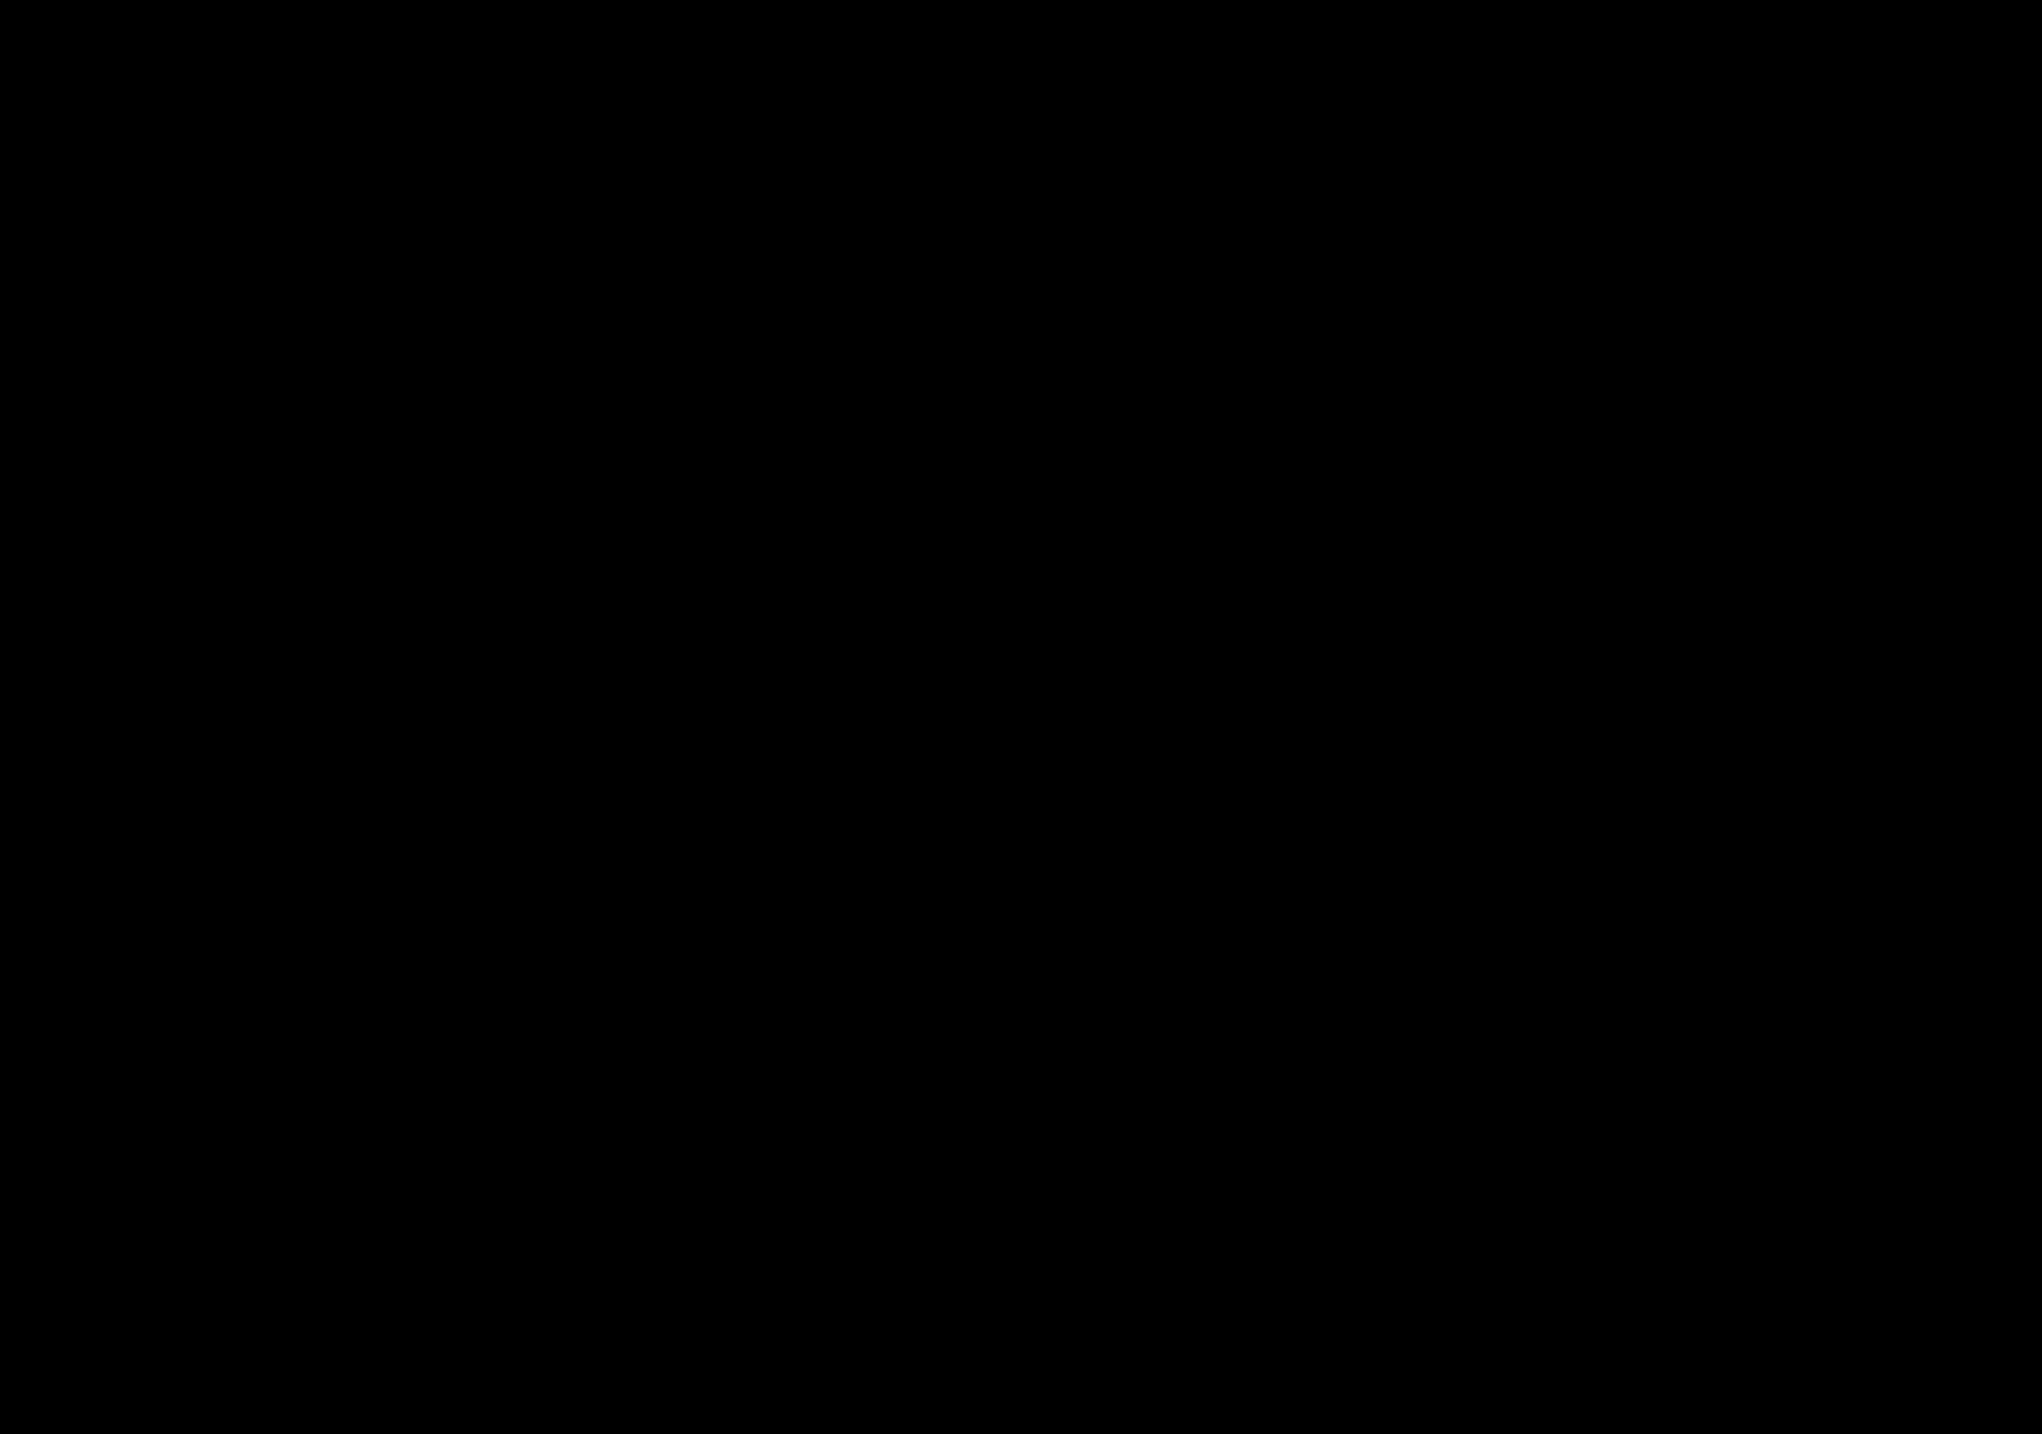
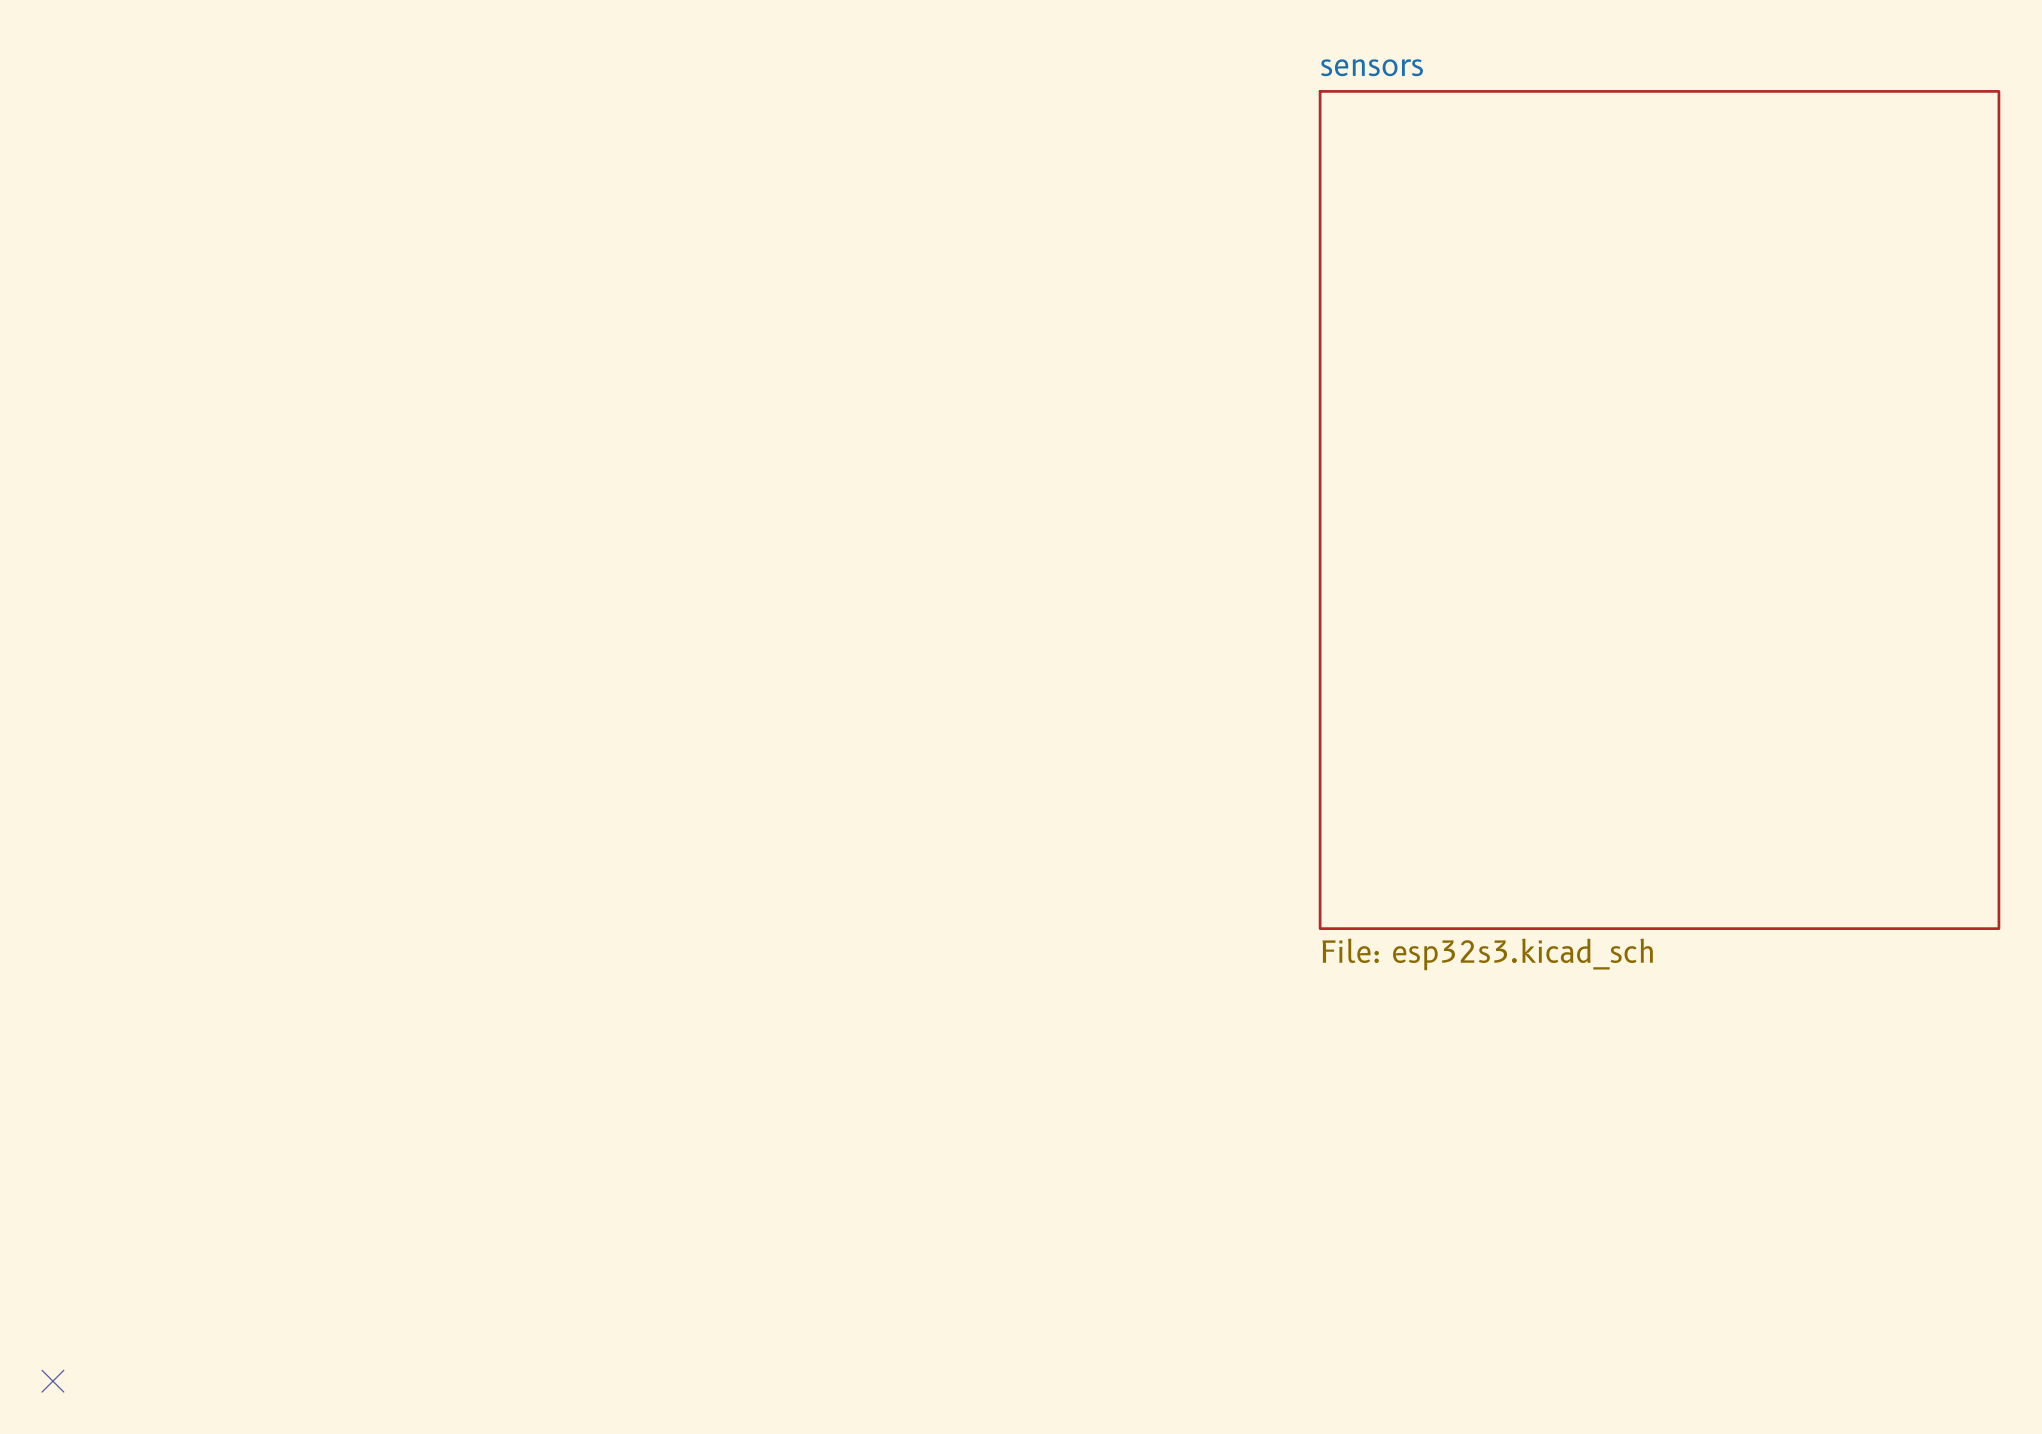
sheet sensors: none -> File: esp32s3.kicad_sch (1659, 510)
no-connect mark: none -> (52, 1381)

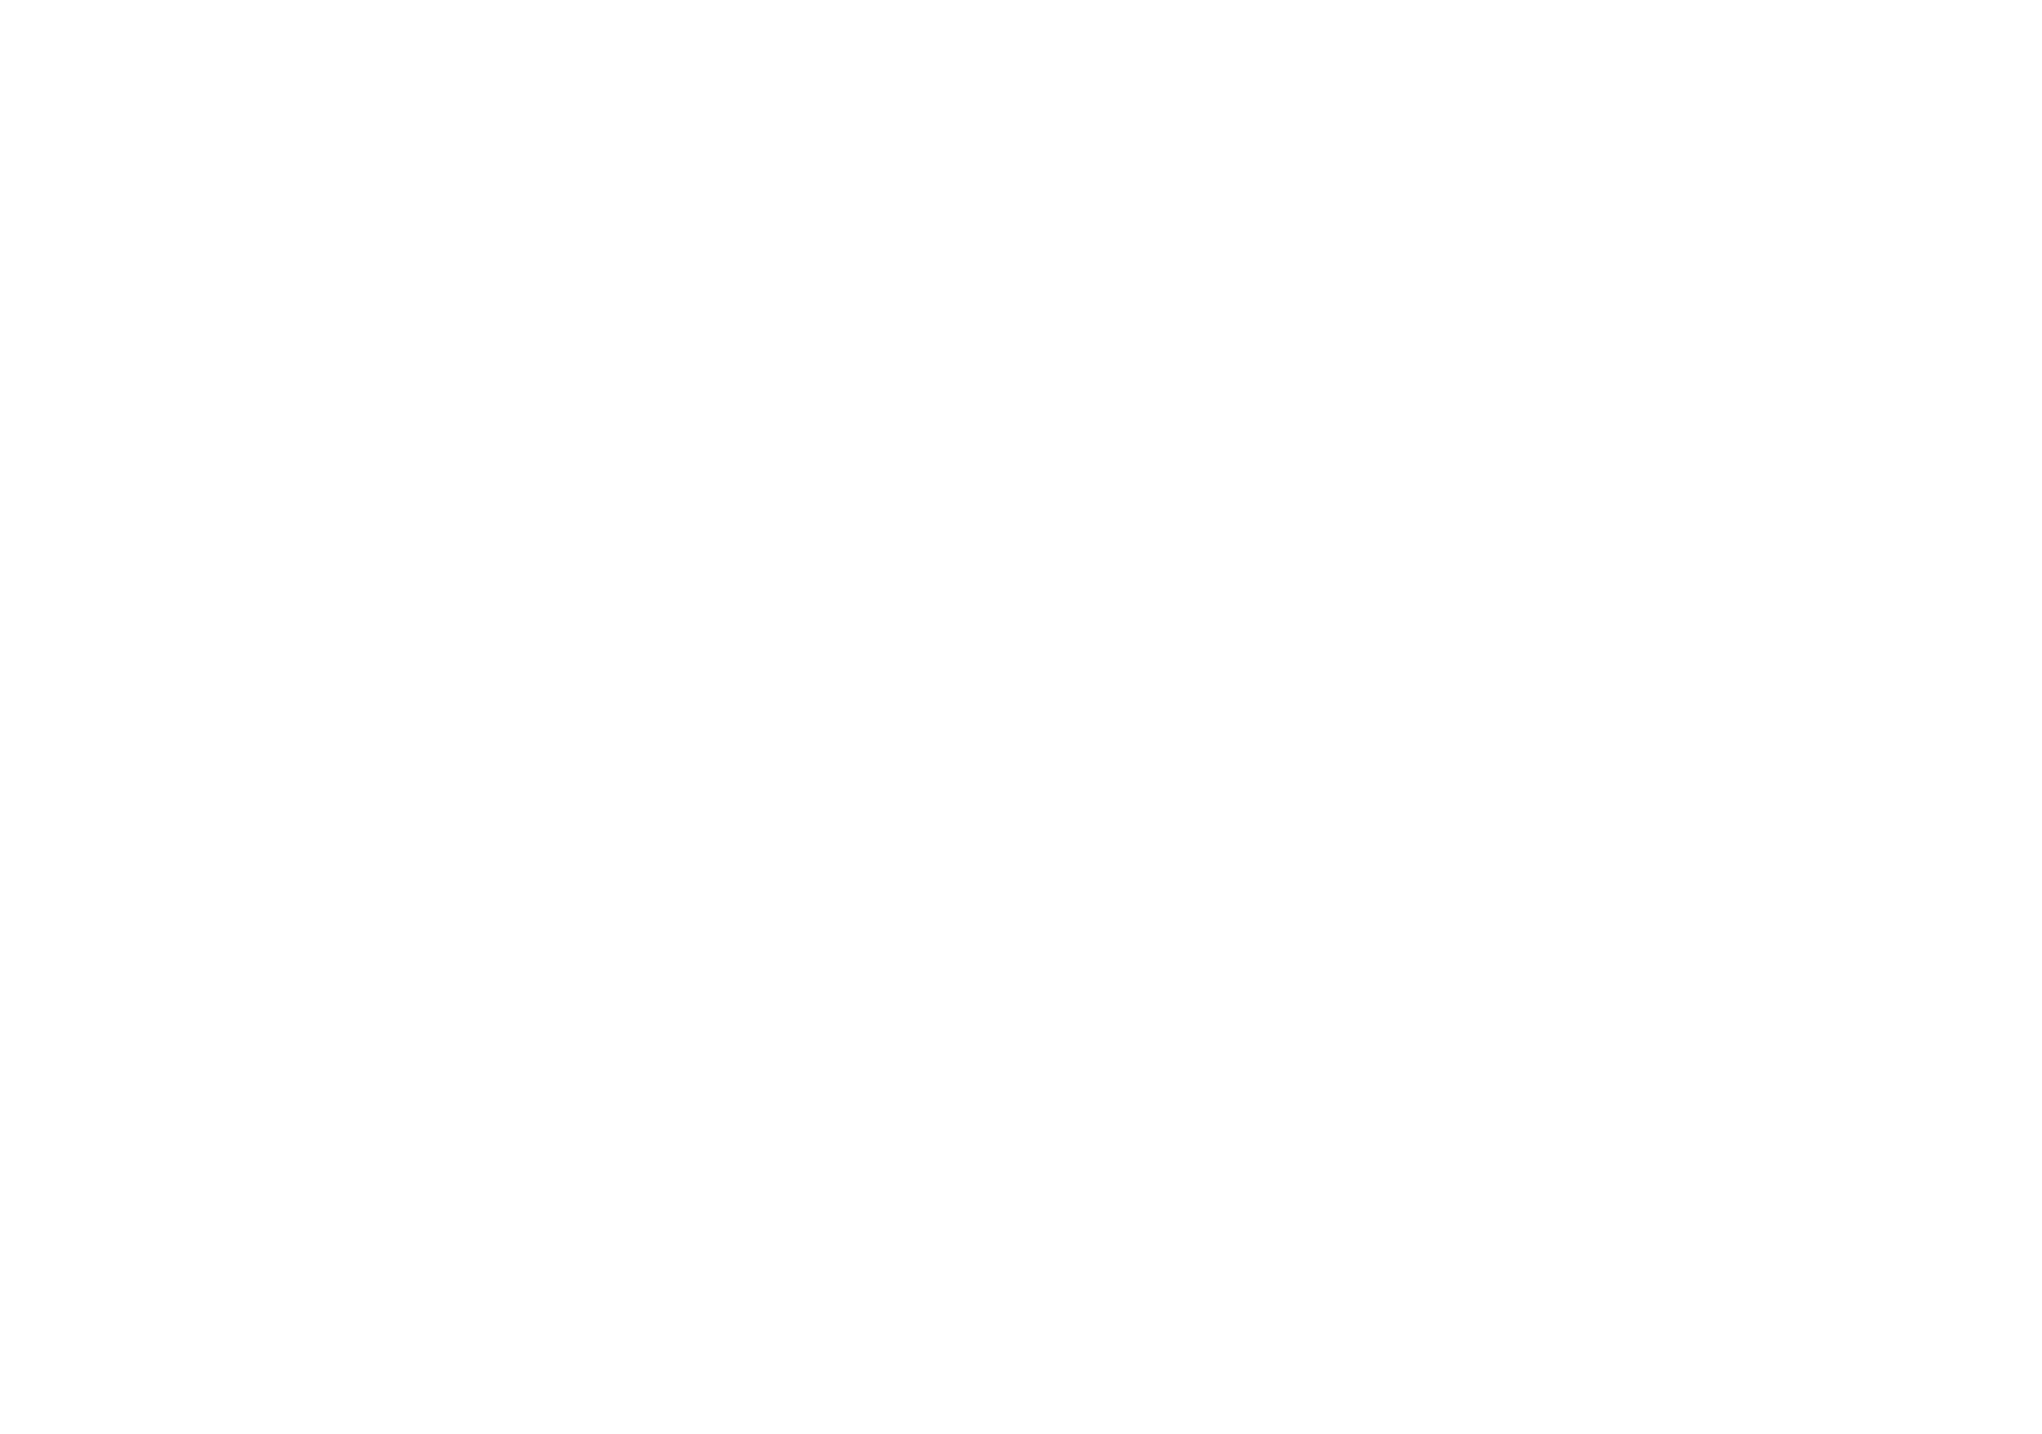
sheet sensors: File: esp32s3.kicad_sch (1659, 510) -> none
no-connect mark: (52, 1381) -> none

